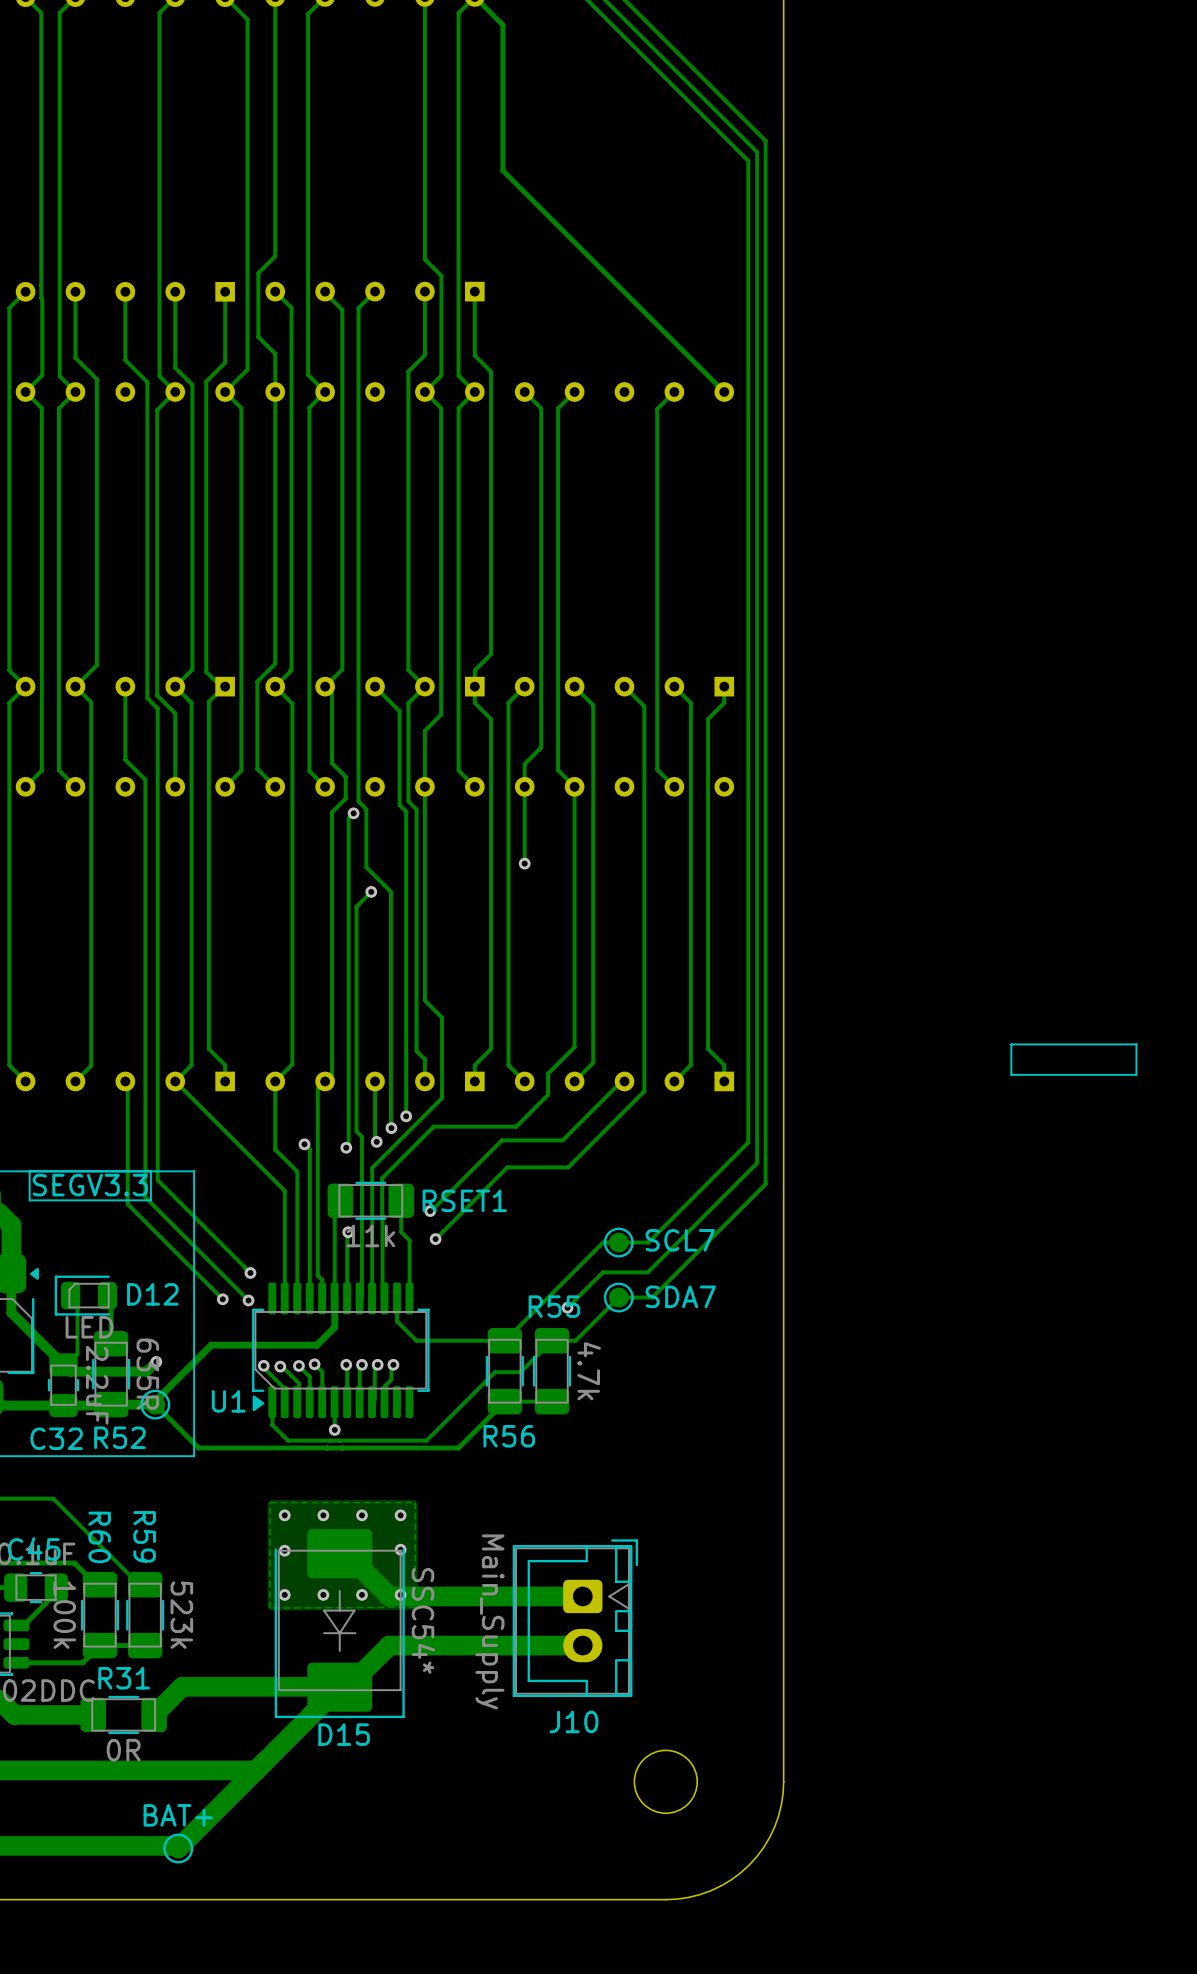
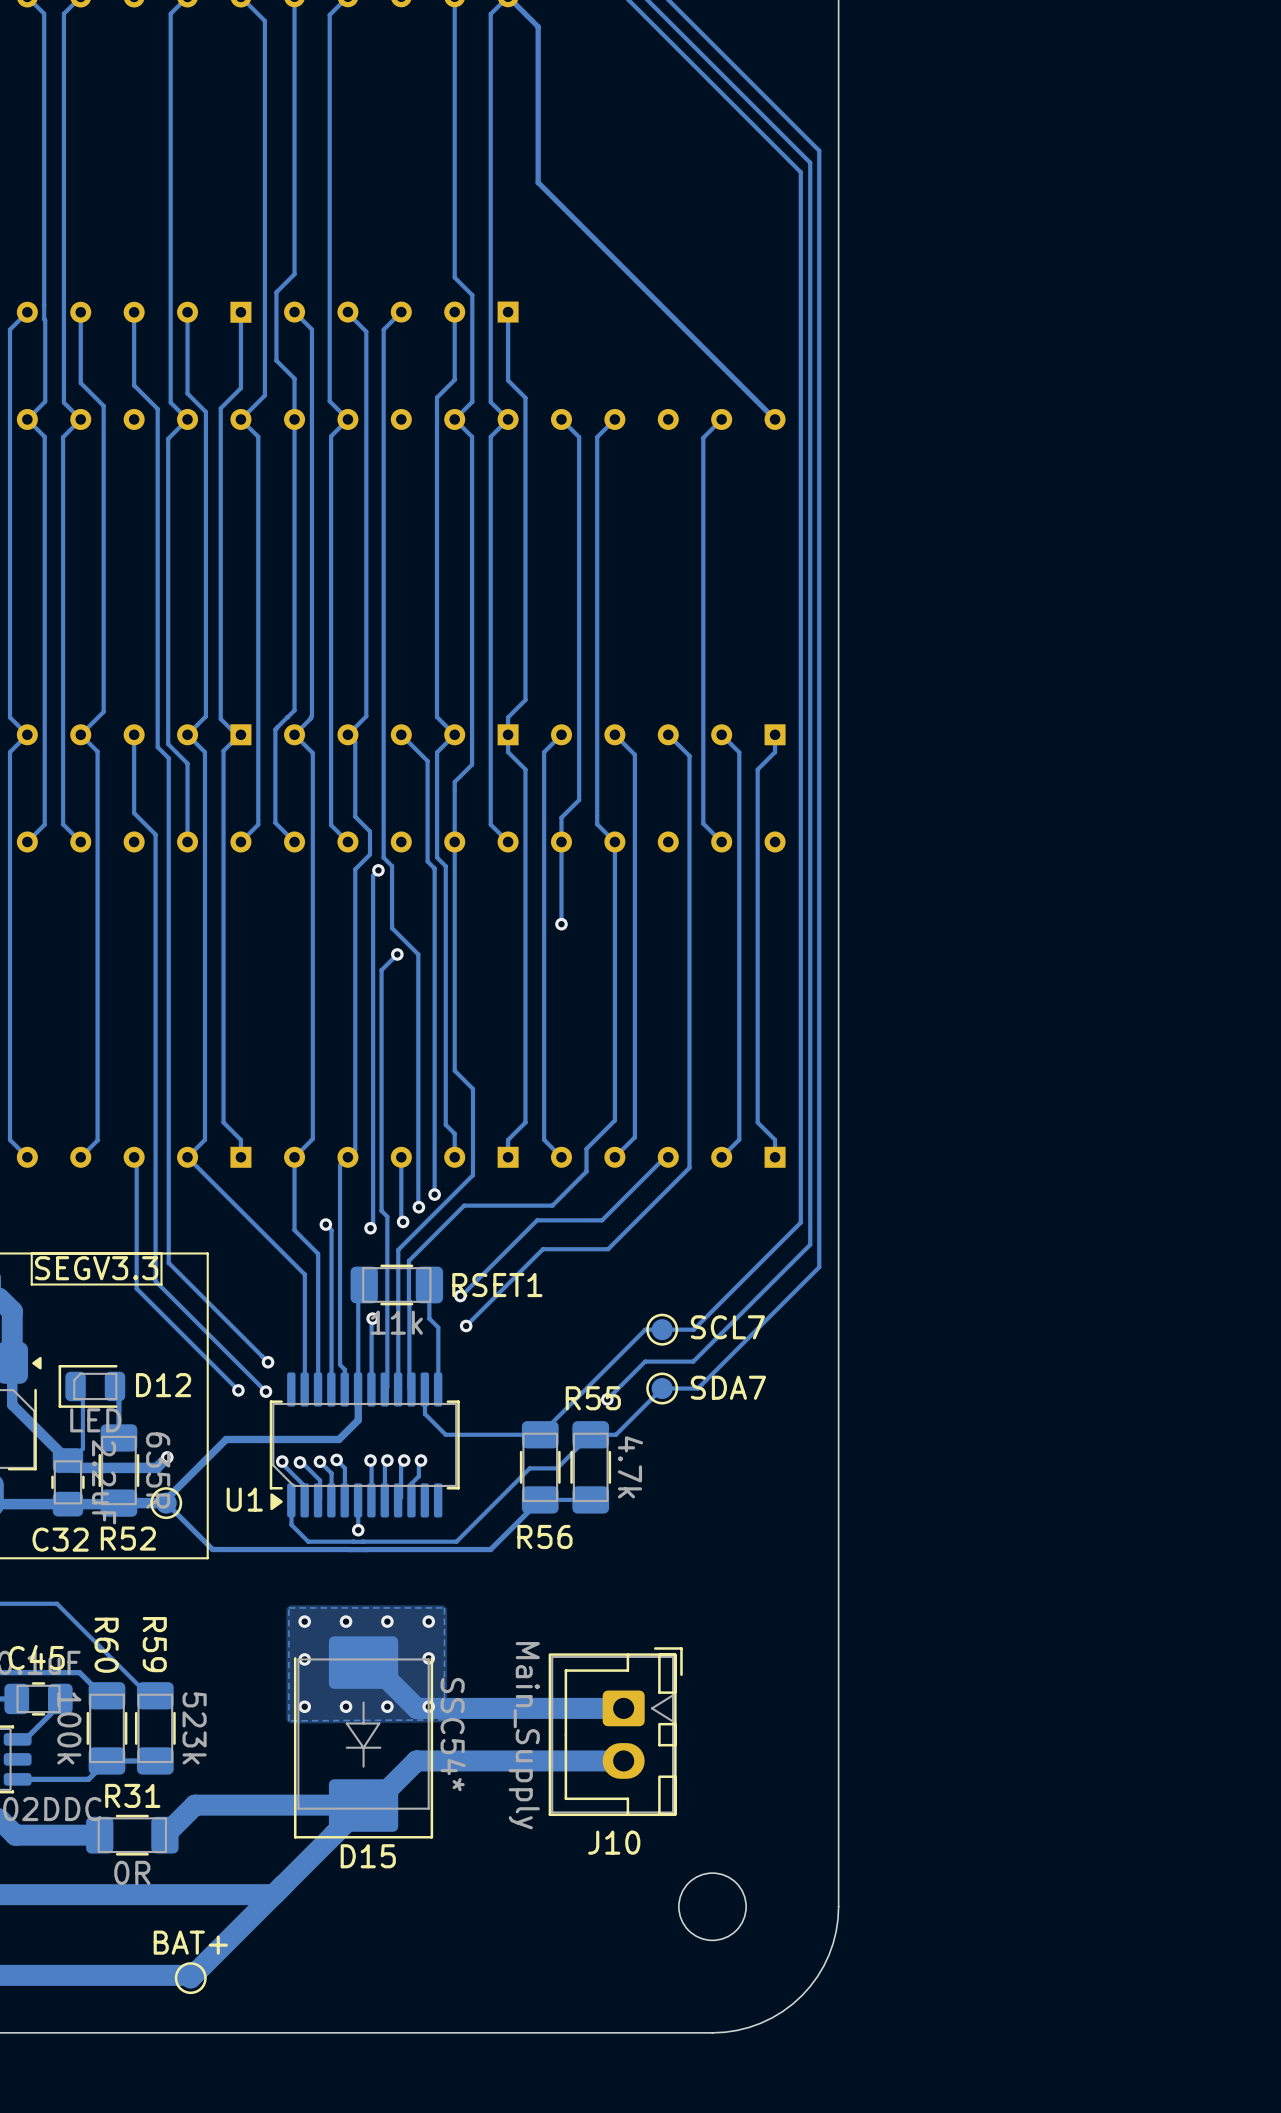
line: (1136, 1044) (1011, 1044) (1011, 1074) (1136, 1074) (1136, 1044) -> none

